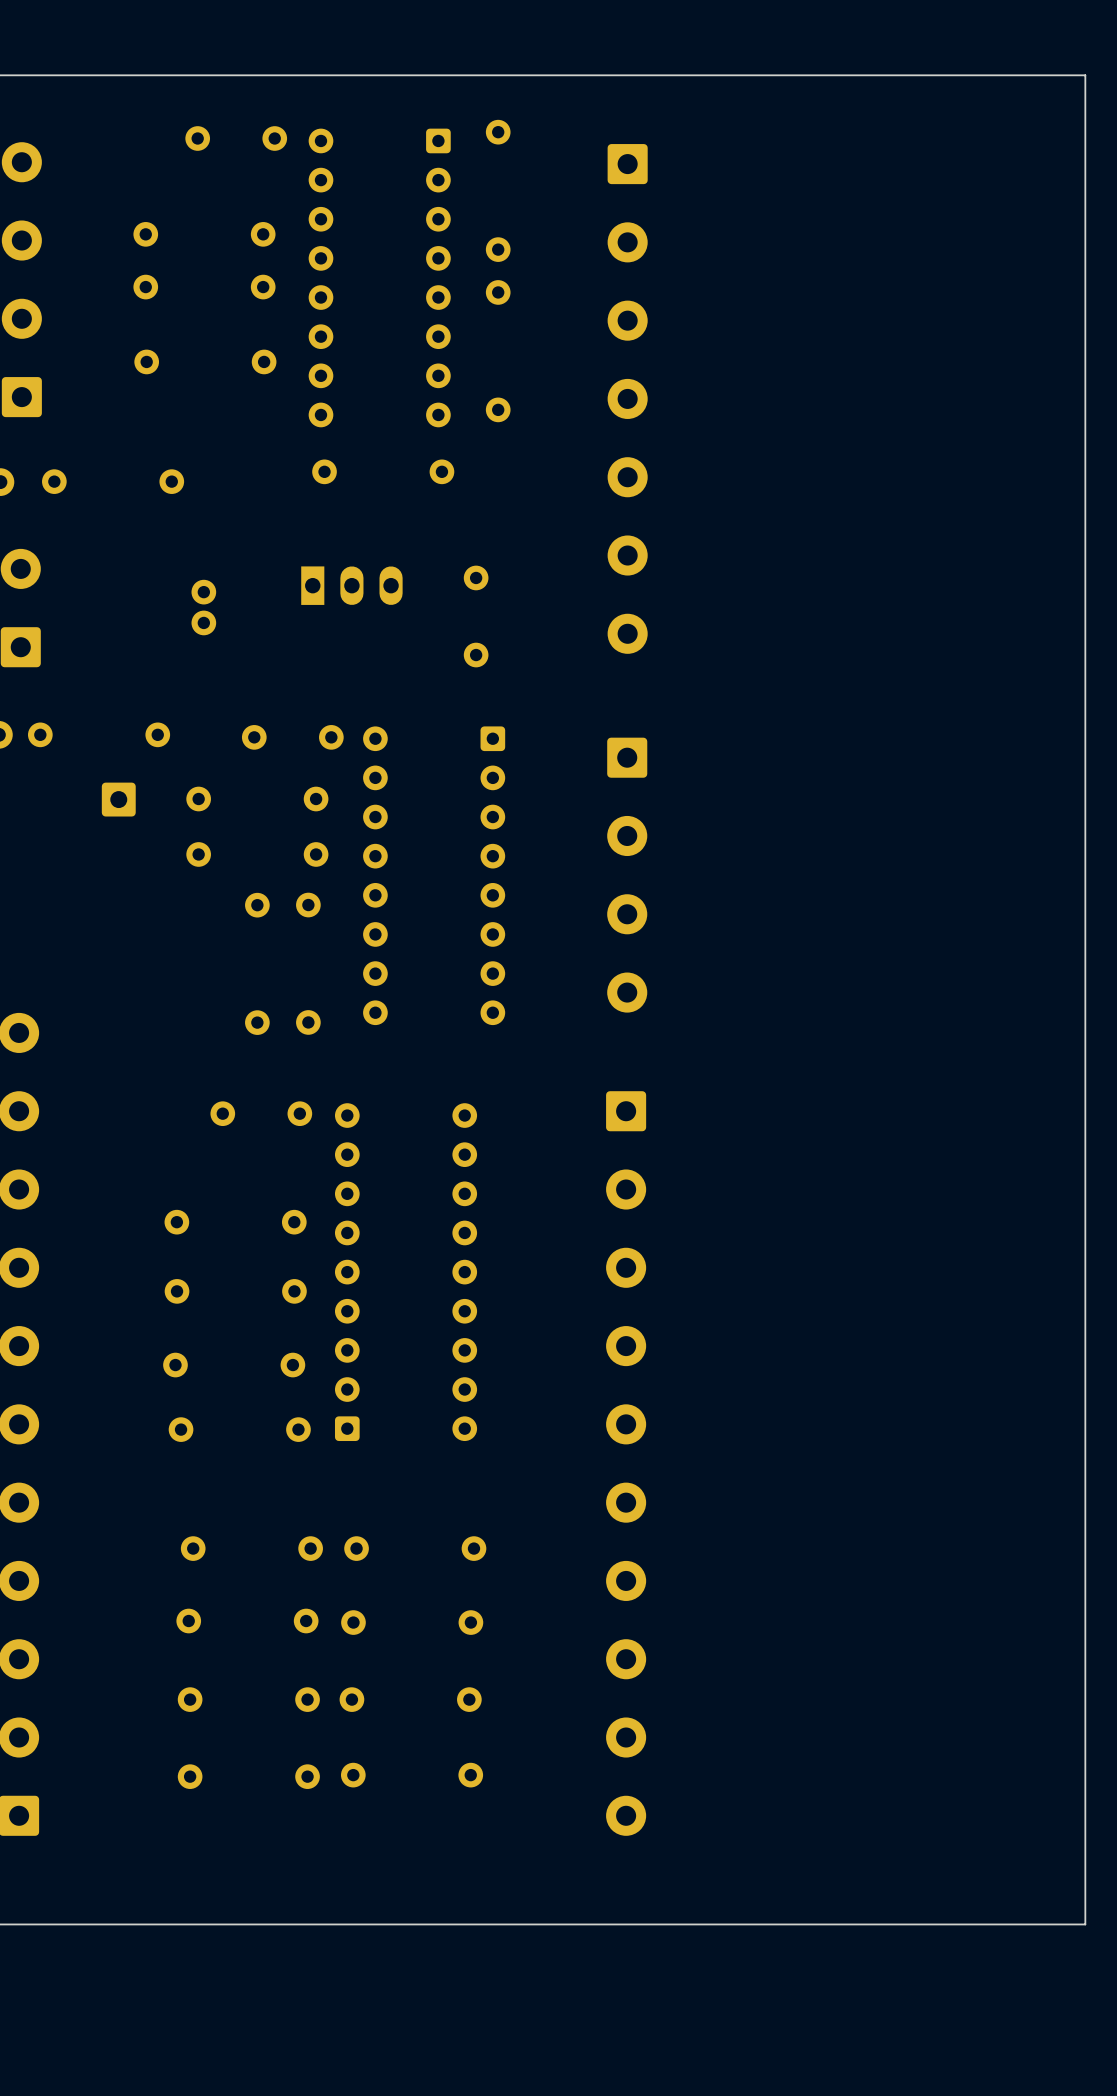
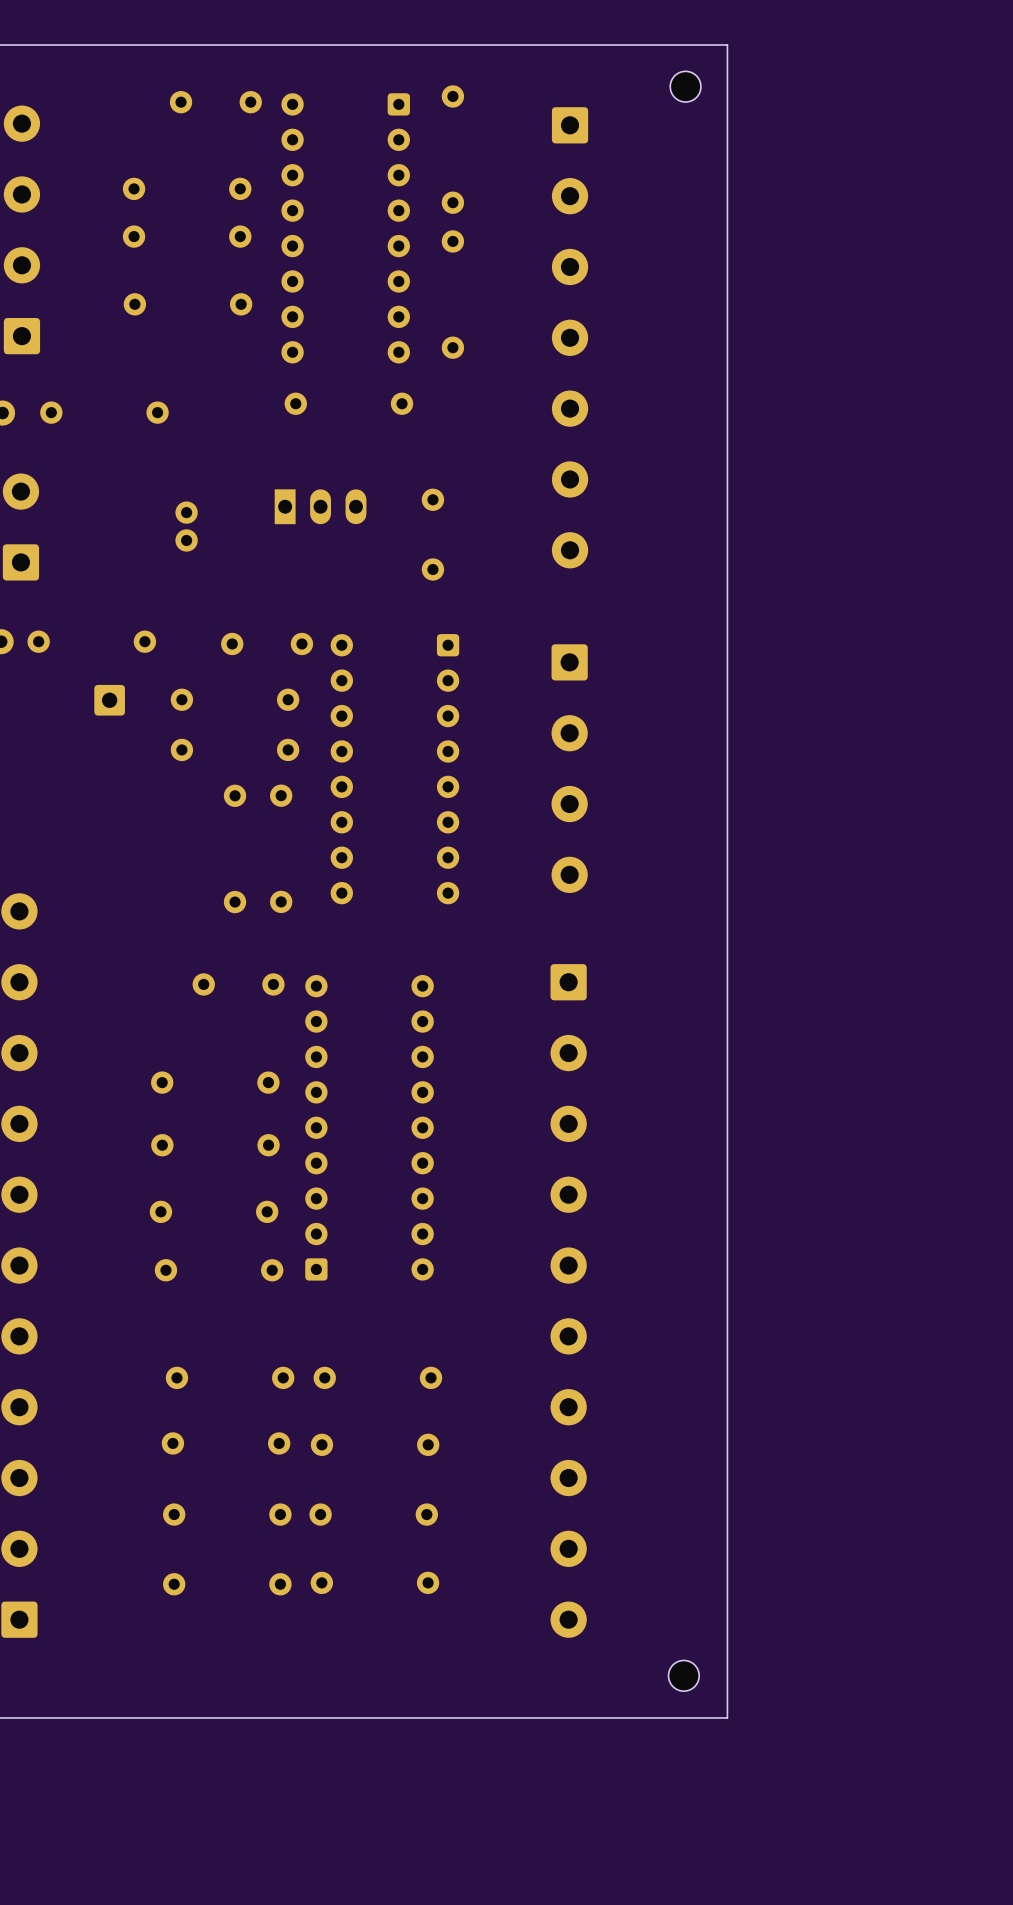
board edge: (801, 75) (1085, 75) (1085, 1924) (801, 1924) -> (727, 45) (727, 1717)
part: none -> (685, 86)
part: none -> (683, 1675)

